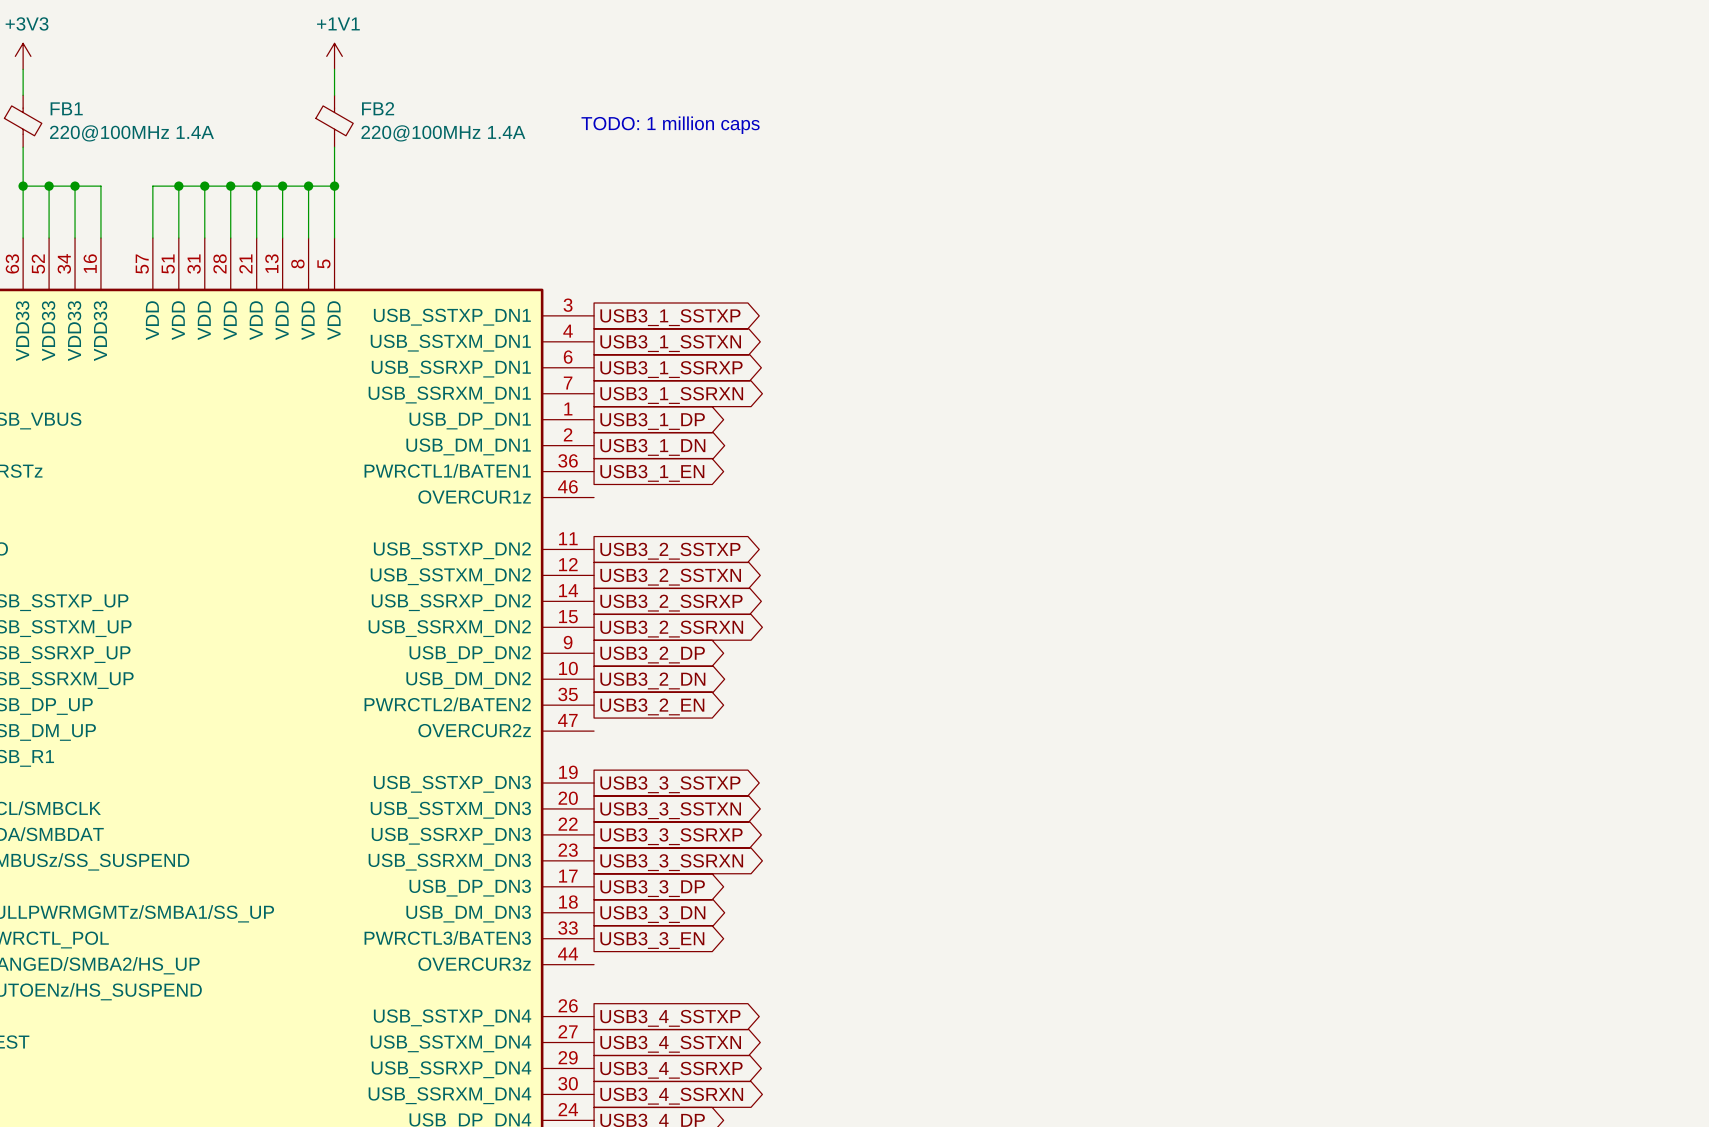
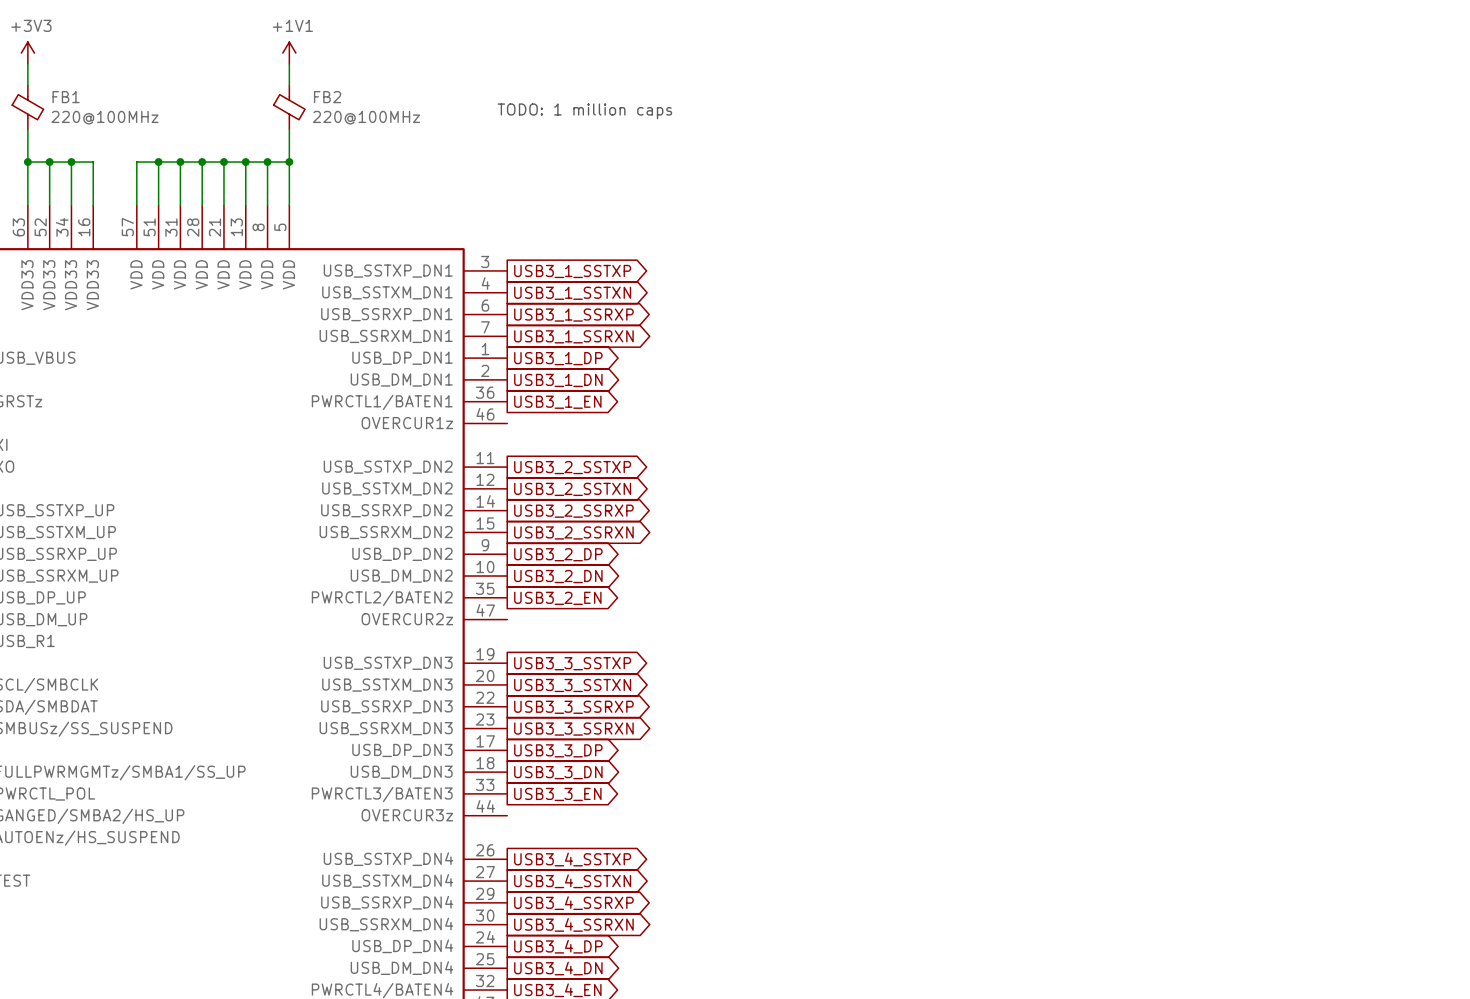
FB1 value: 220@100MHz 1.4A (131, 133) -> 220@100MHz (104, 117)
FB2 value: 220@100MHz 1.4A (443, 133) -> 220@100MHz (366, 117)

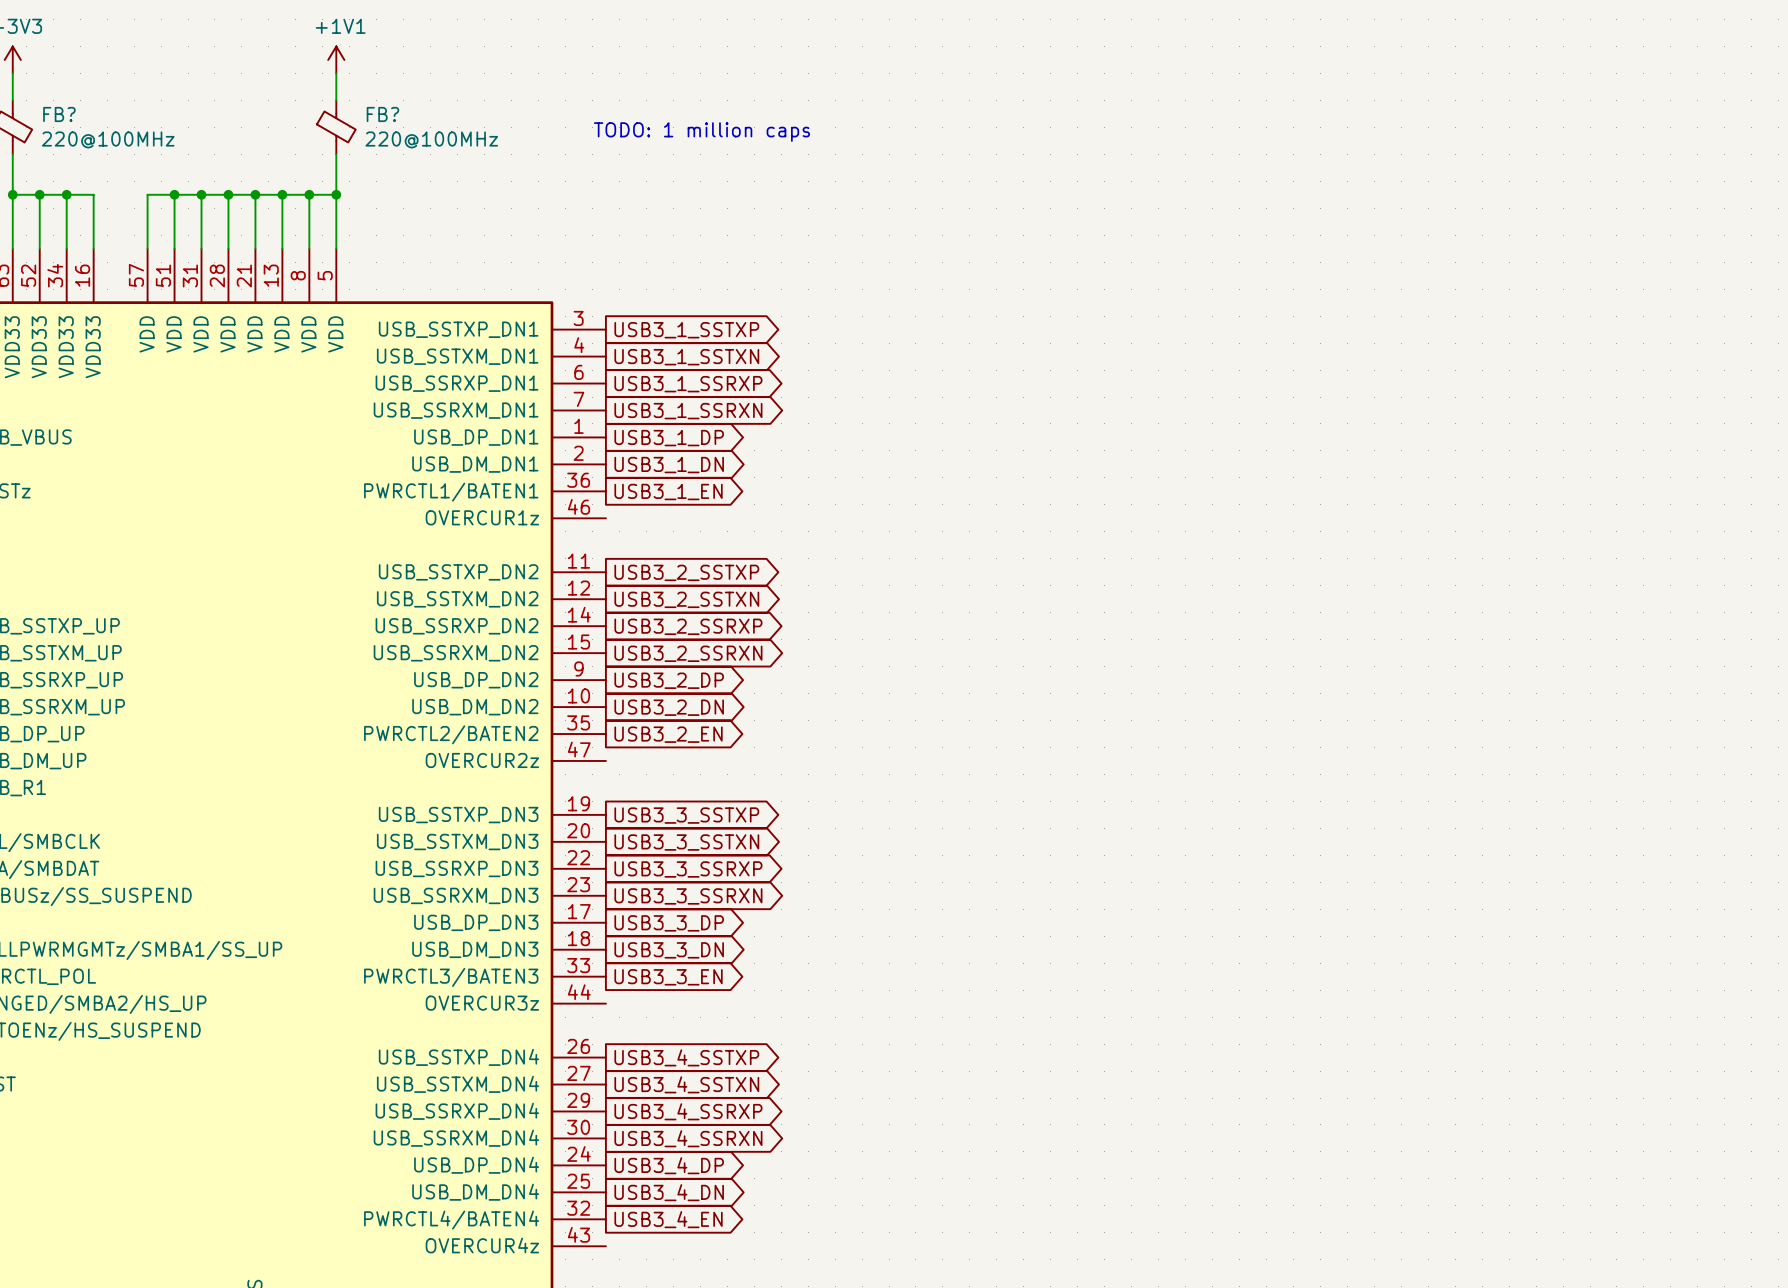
FB1 name: FB1 (66, 97) -> FB? (59, 114)
FB2 name: FB2 (327, 97) -> FB? (382, 114)

